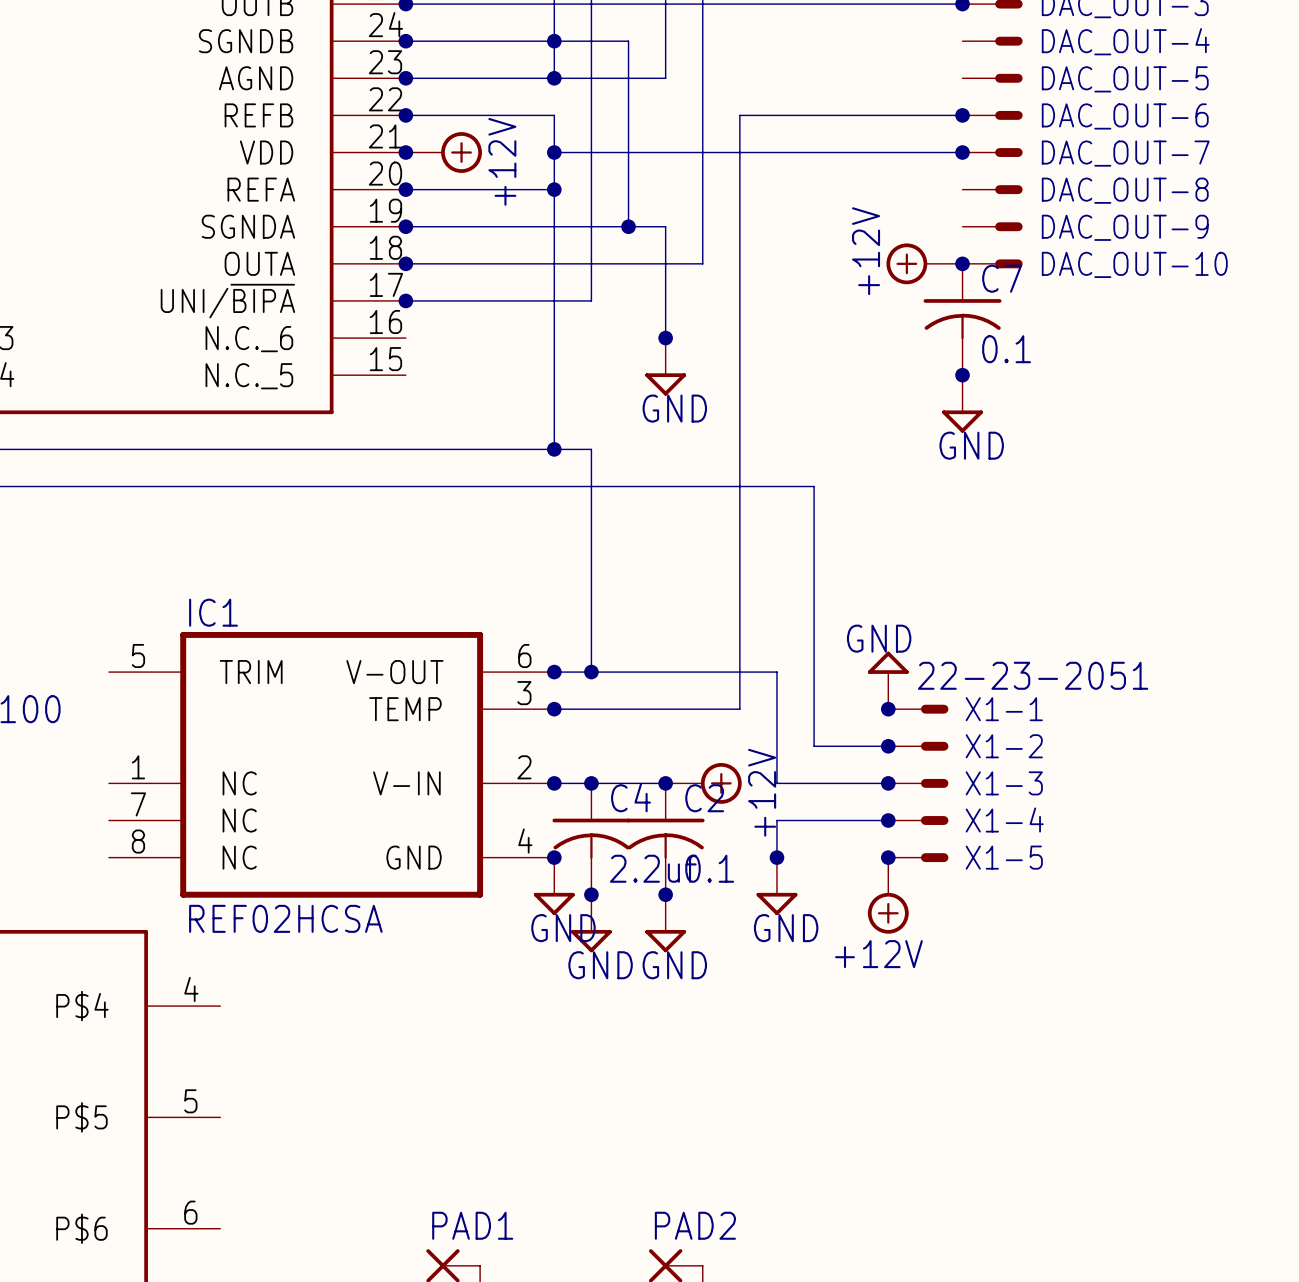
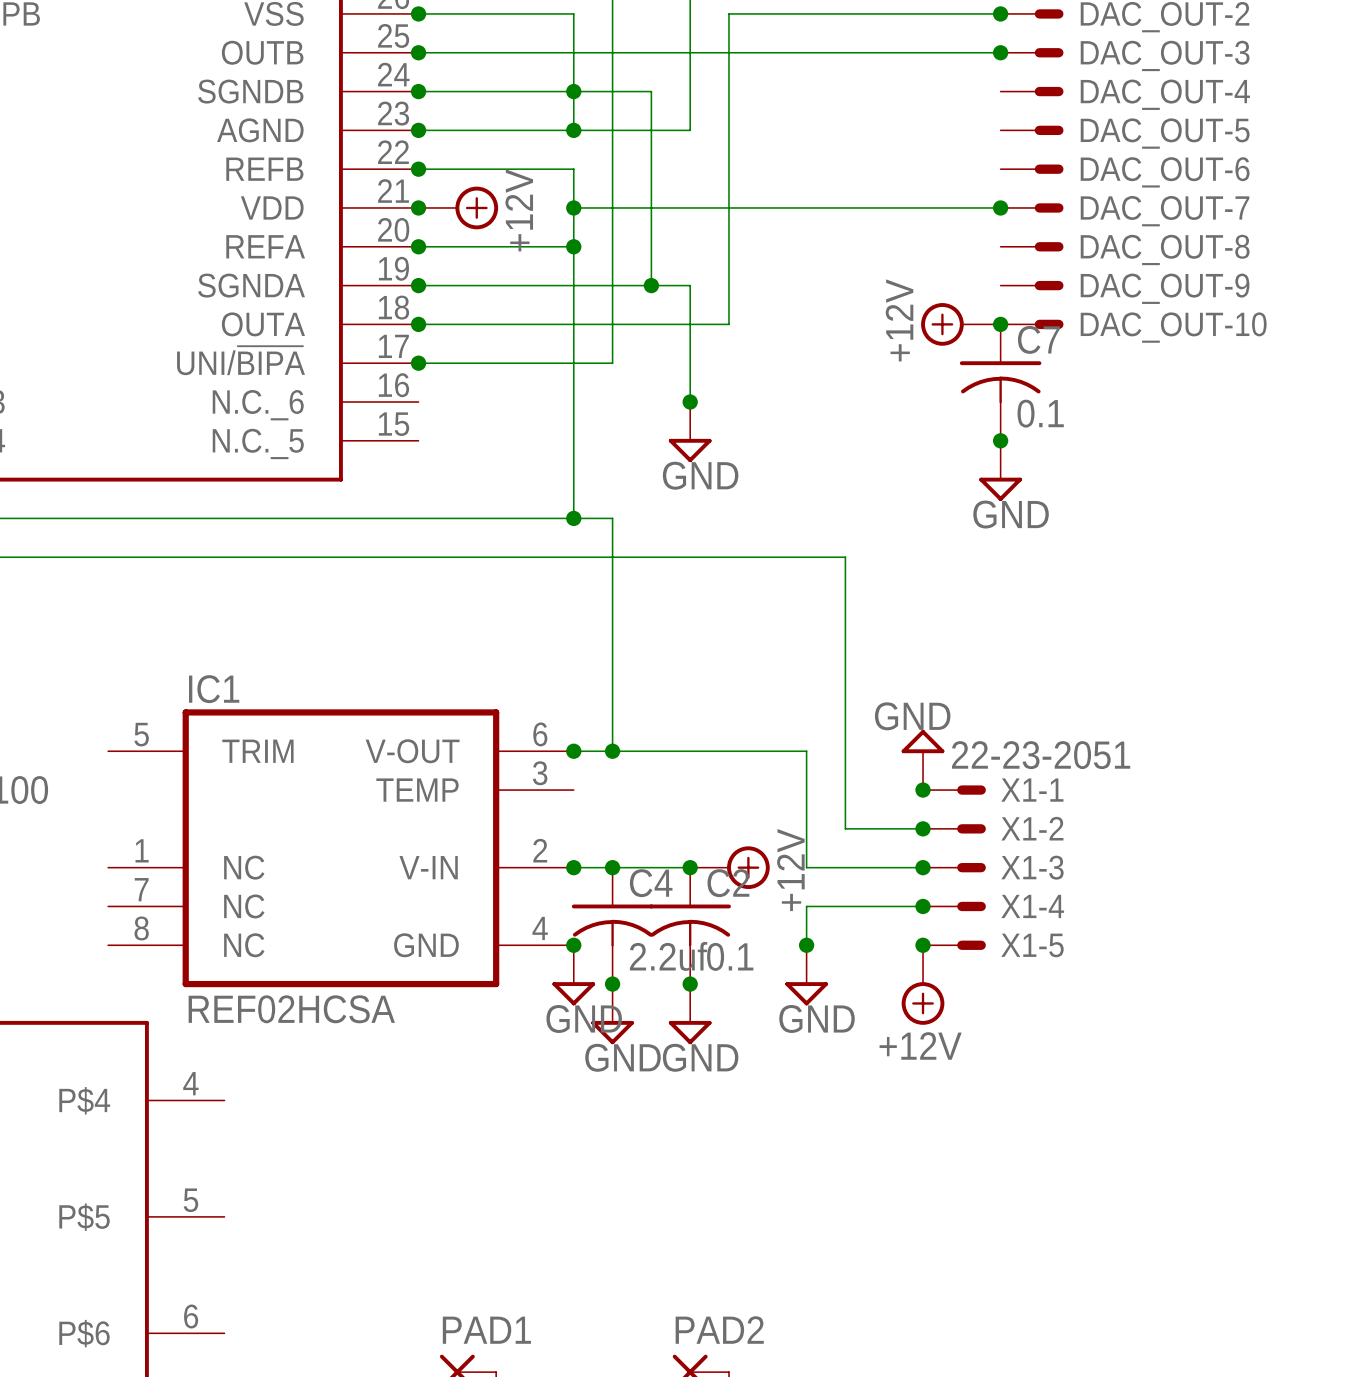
wire: (962, 115) (739, 115) (739, 709) (554, 709) -> none
junction: (962, 115) -> none
junction: (554, 709) -> none

